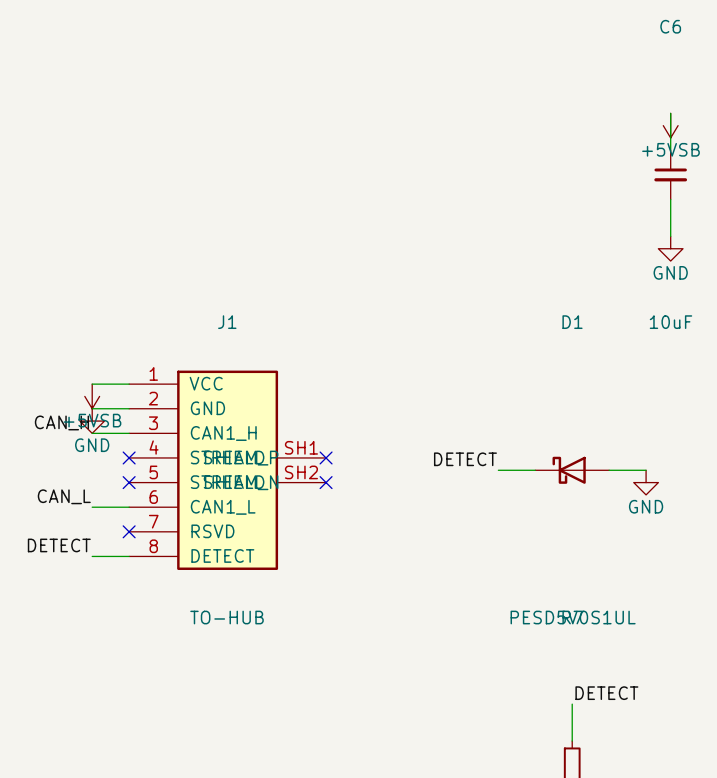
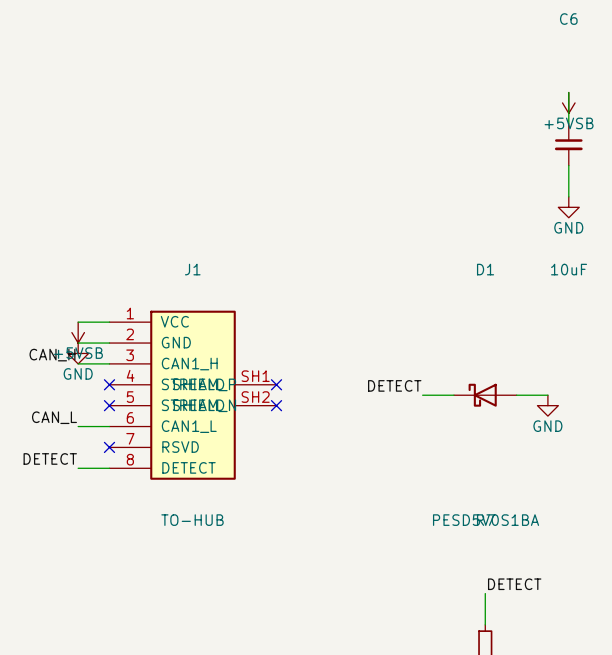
D1 value: PESD5V0S1UL (573, 617) -> PESD5V0S1BA (486, 520)

